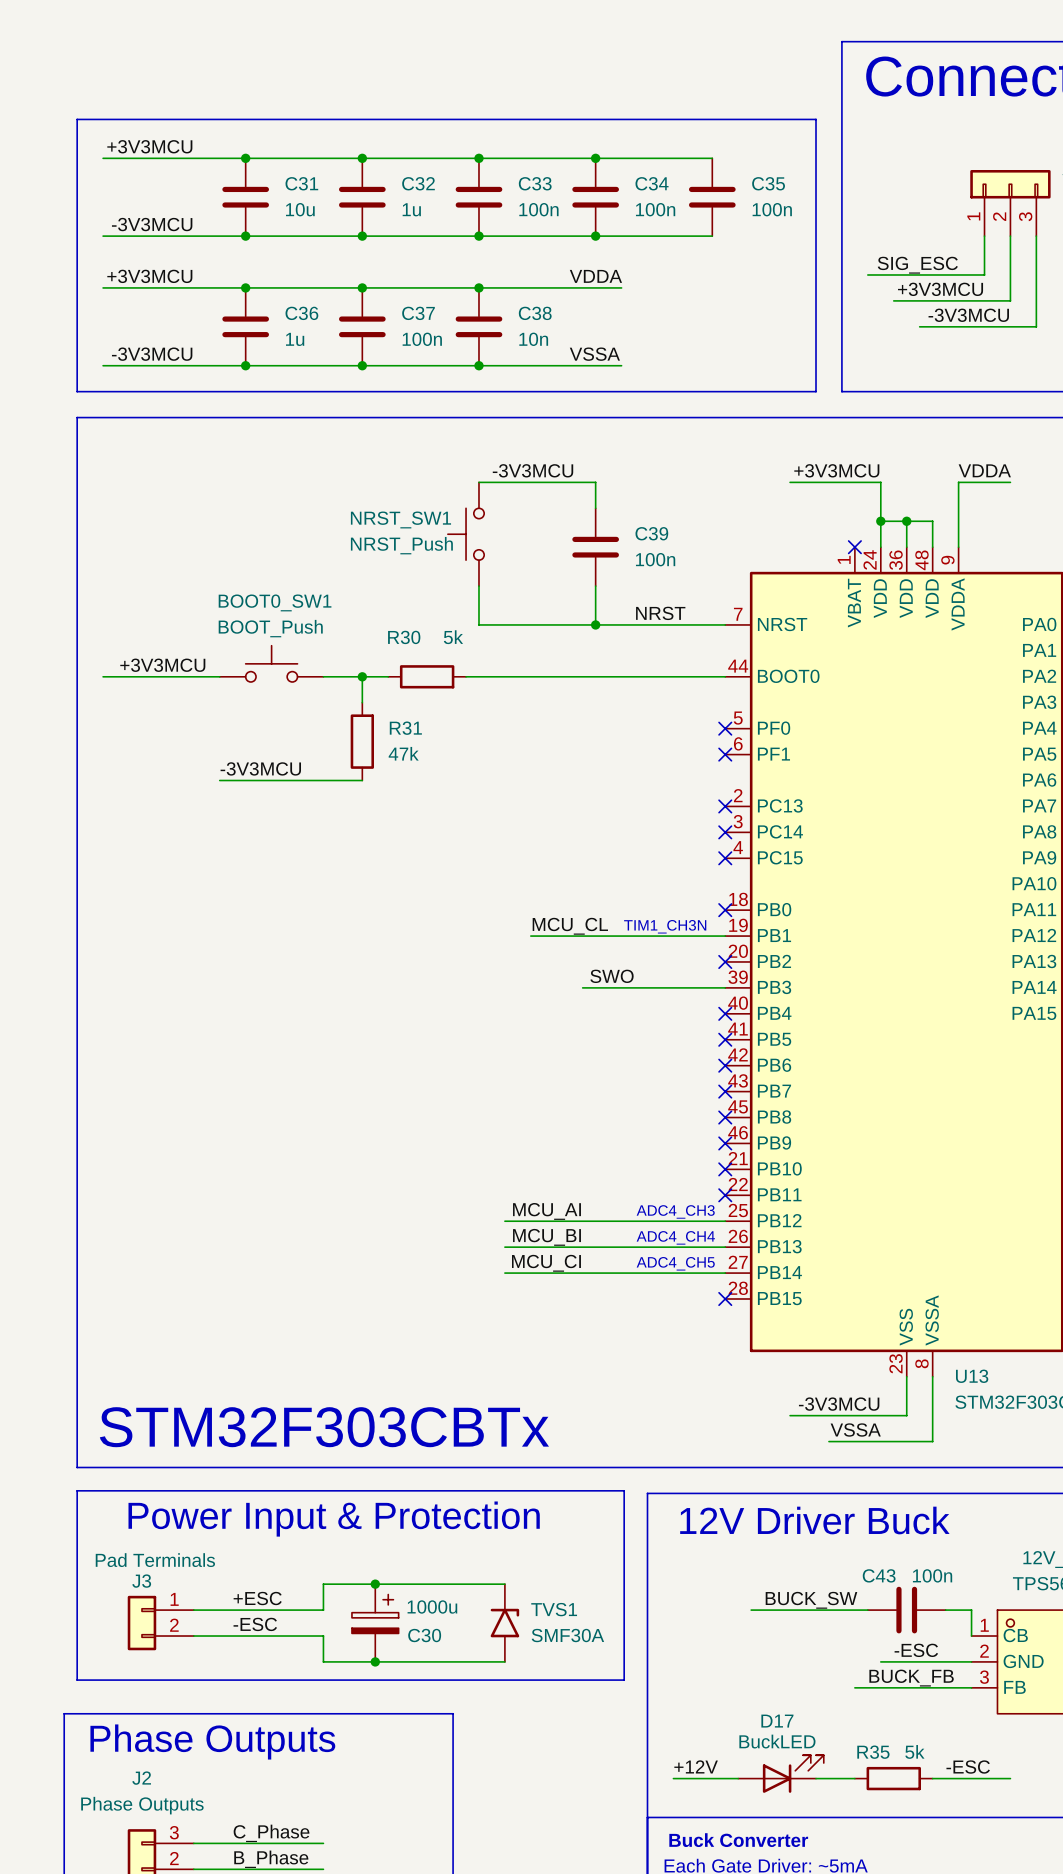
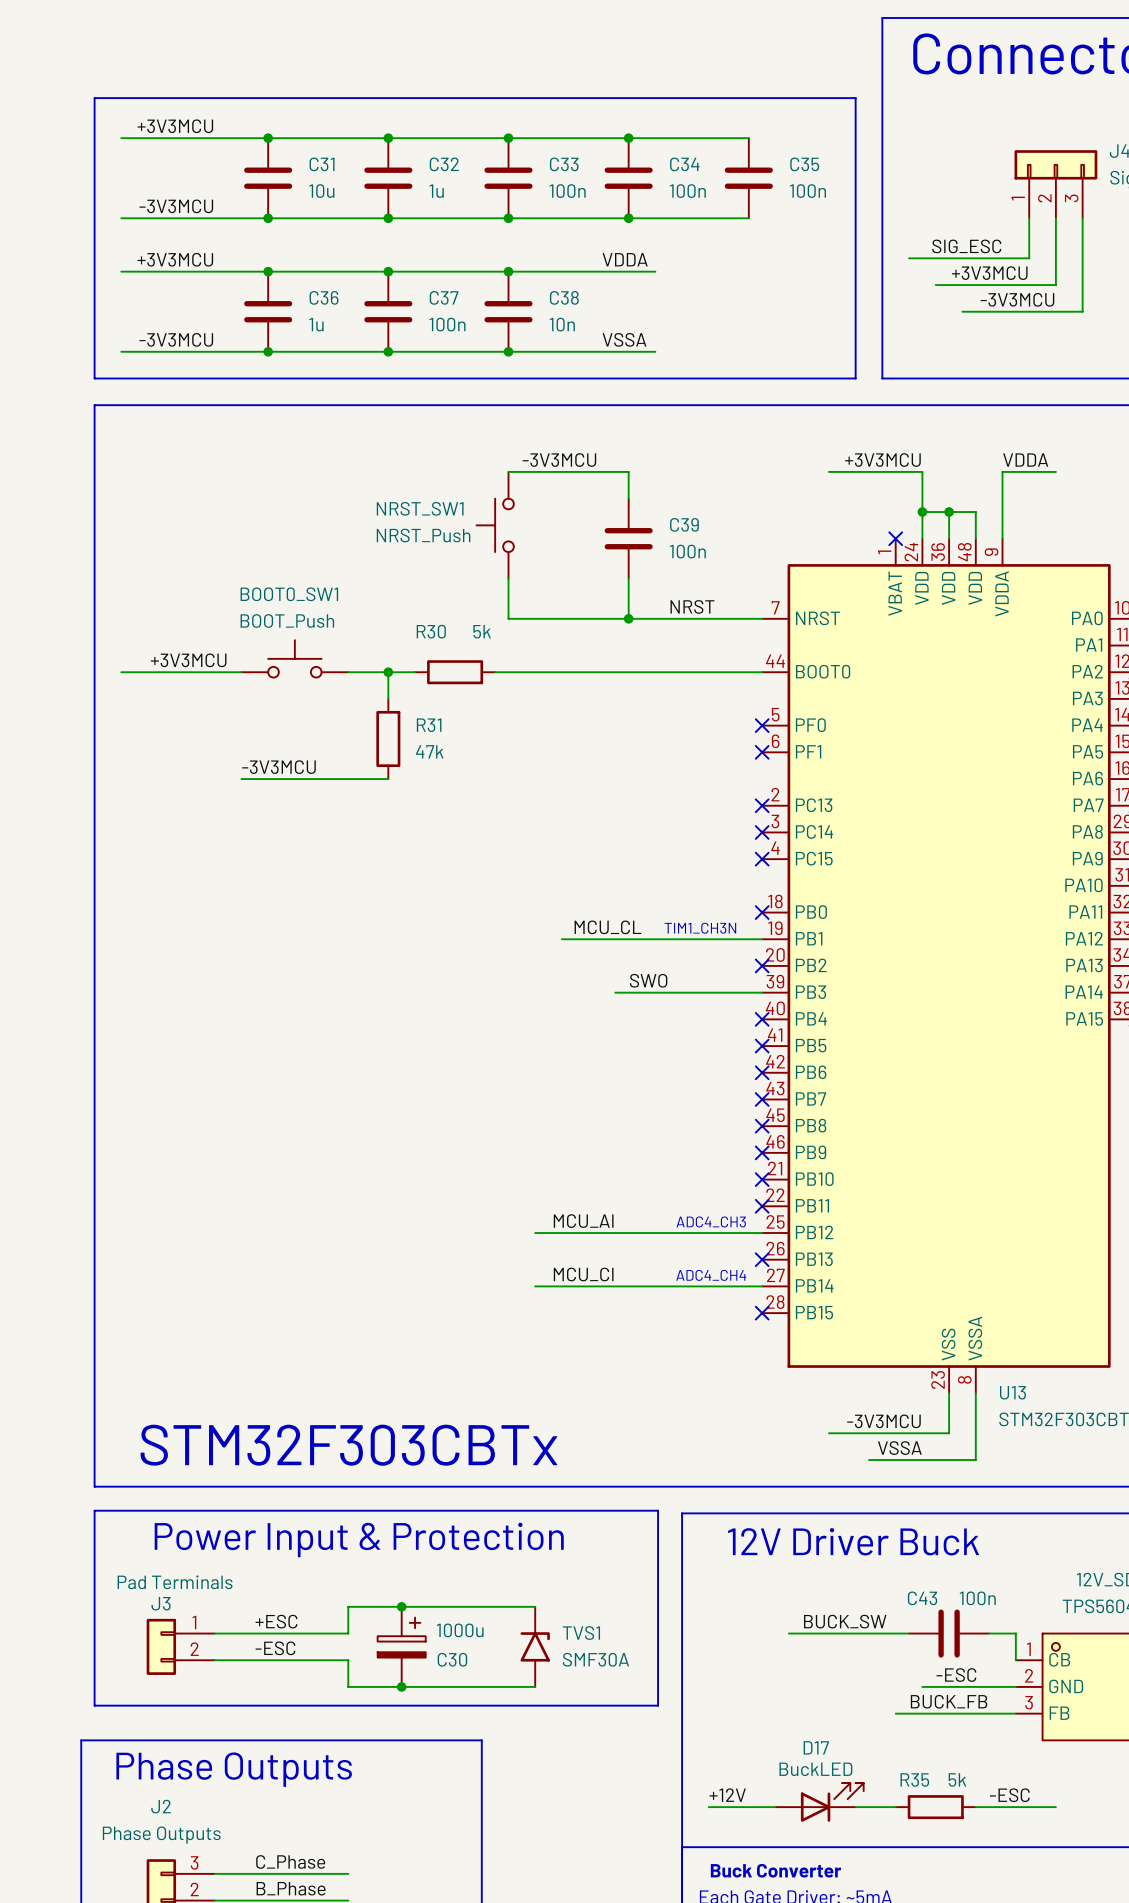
label: MCU_BI (547, 1237) -> none
text: ADC4_CH4 (675, 1237) -> none
wire: (504, 1247) (725, 1247) -> none
no-connect mark: none -> (762, 1259)
text: ADC4_CH5 (675, 1263) -> ADC4_CH4 (711, 1275)

